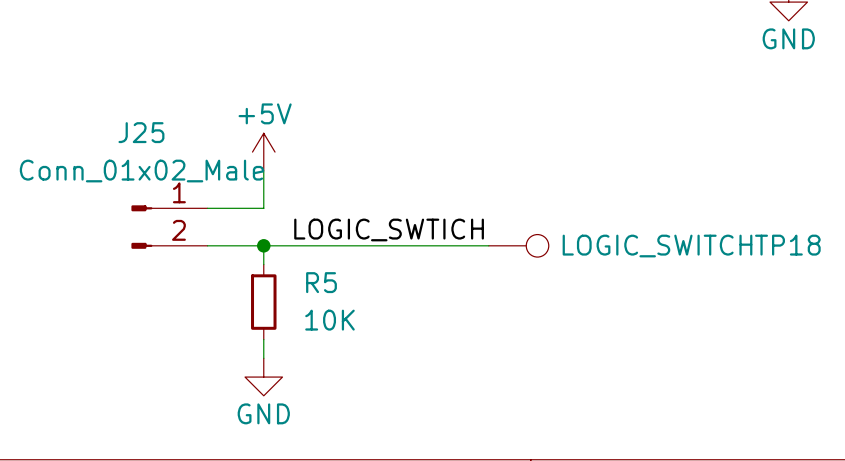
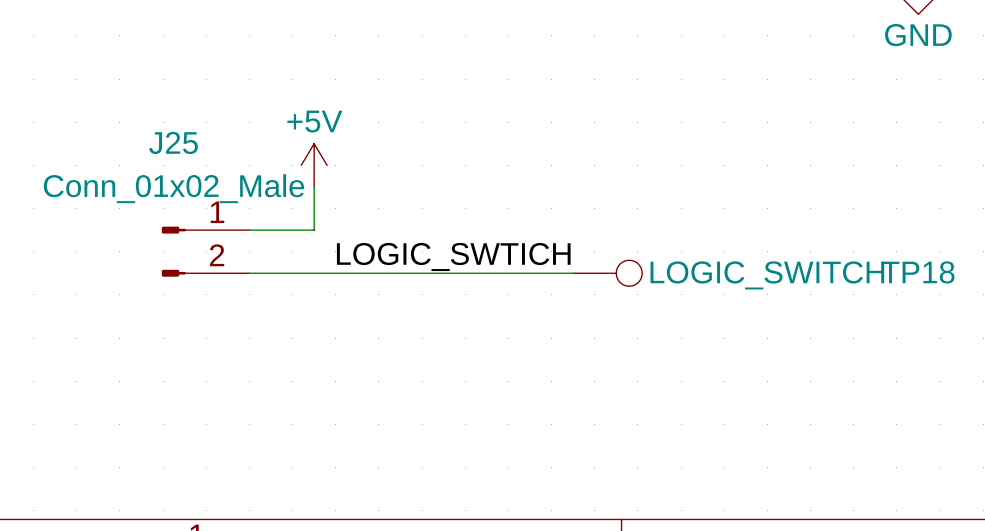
wire: (263, 245) (263, 264) -> none
junction: (263, 245) -> none
R5: 10K (263, 302) -> none
wire: (263, 339) (263, 358) -> none
power symbol: GND (263, 377) -> none

